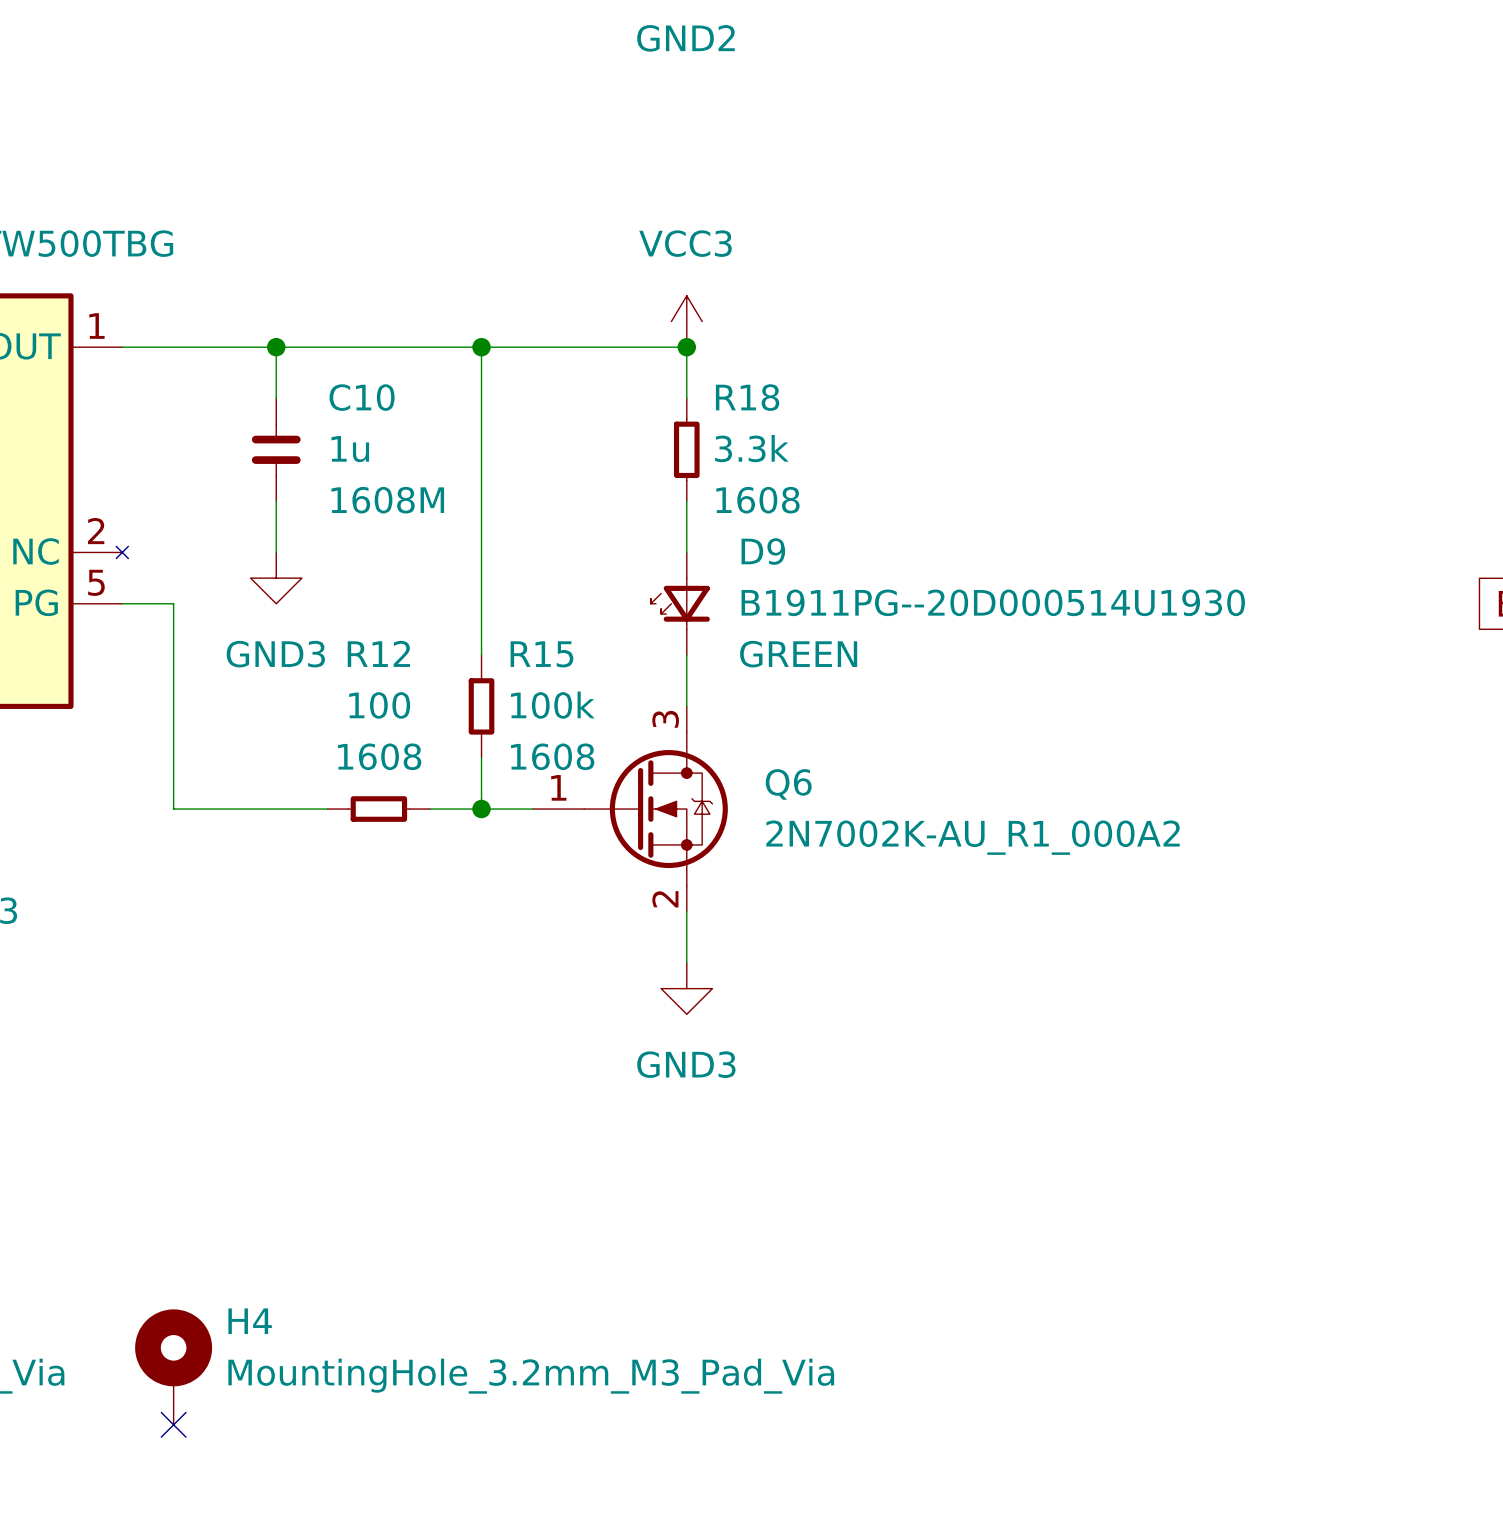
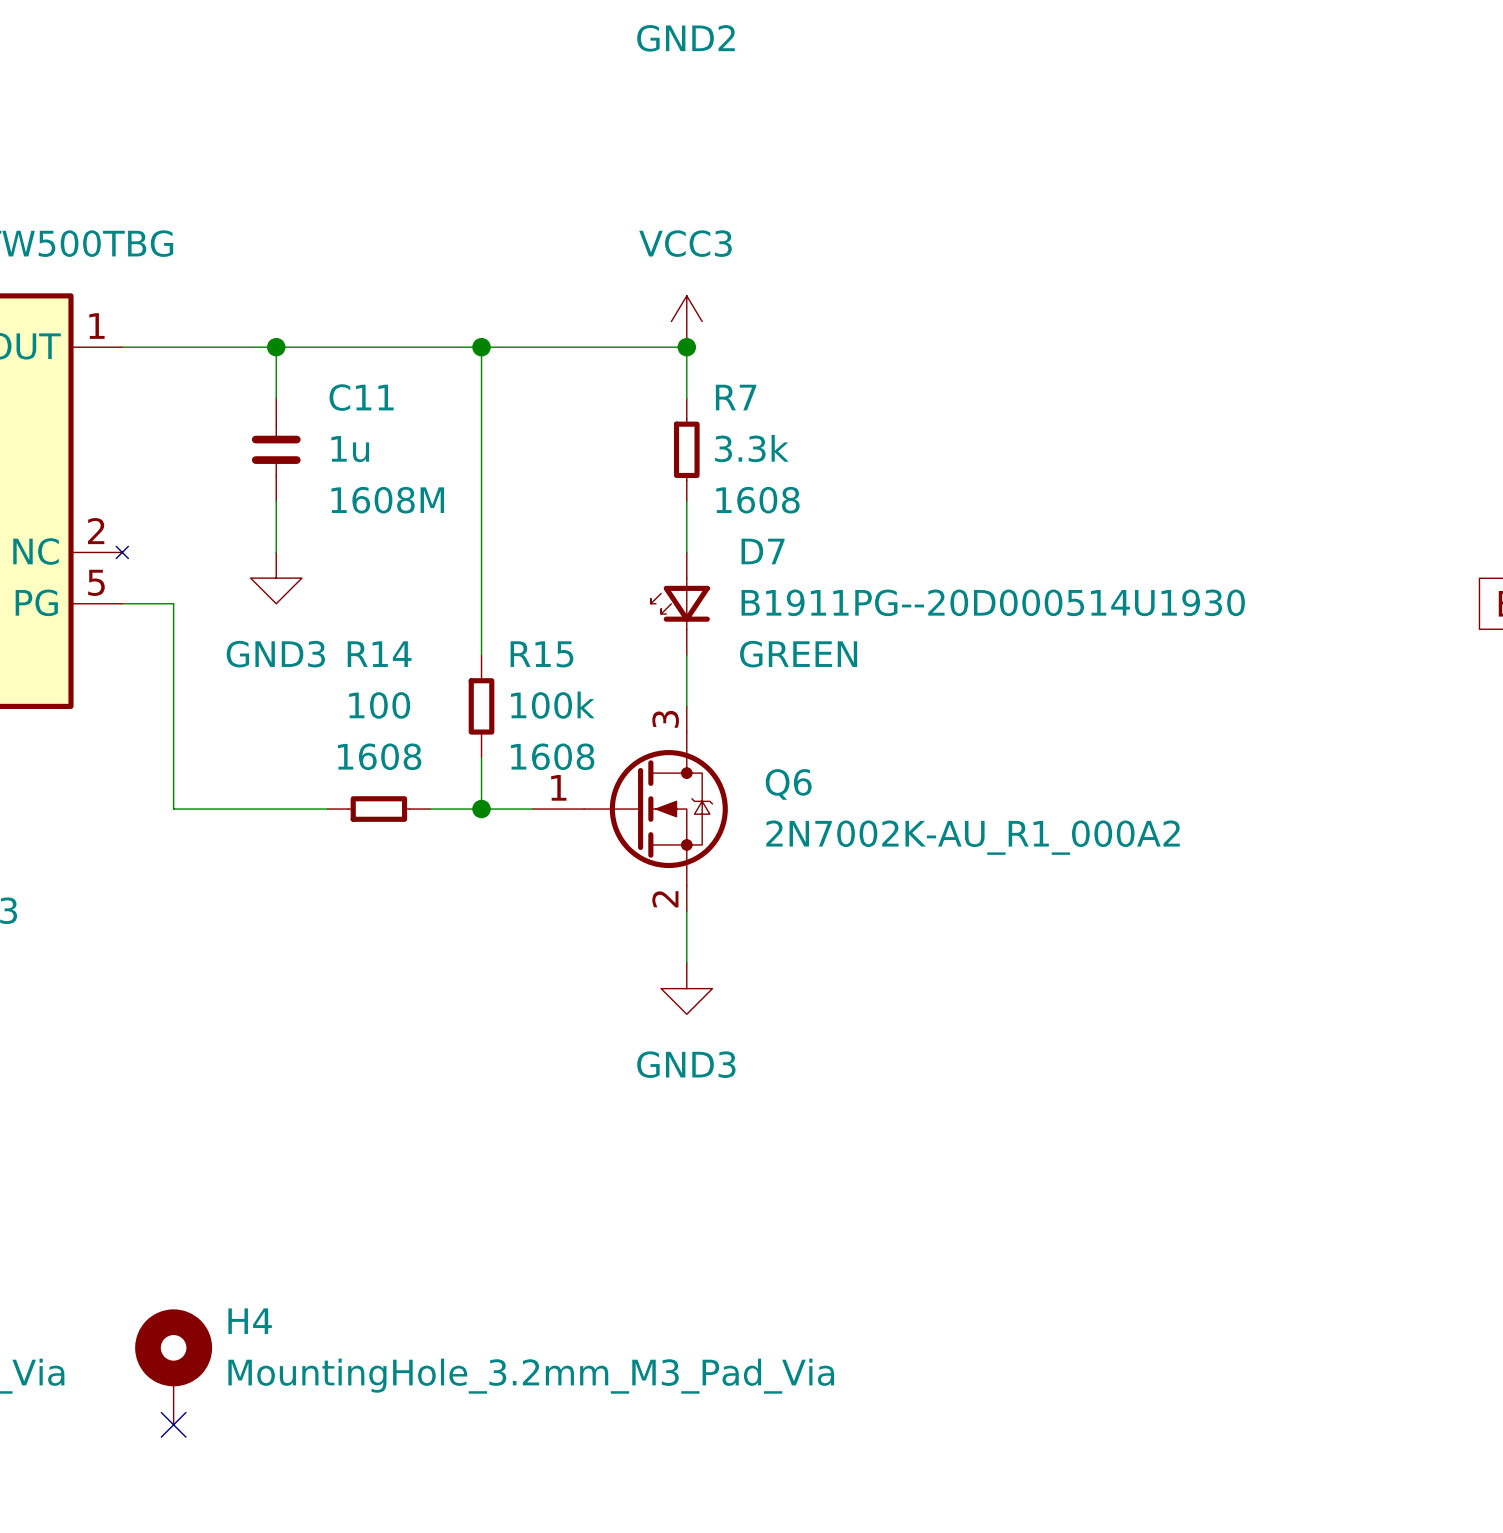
C10 name: C10 (362, 397) -> C11 (361, 397)
R18 name: R18 (747, 397) -> R7 (736, 397)
D9 name: D9 (763, 551) -> D7 (763, 551)
R12 name: R12 (378, 653) -> R14 (379, 654)

